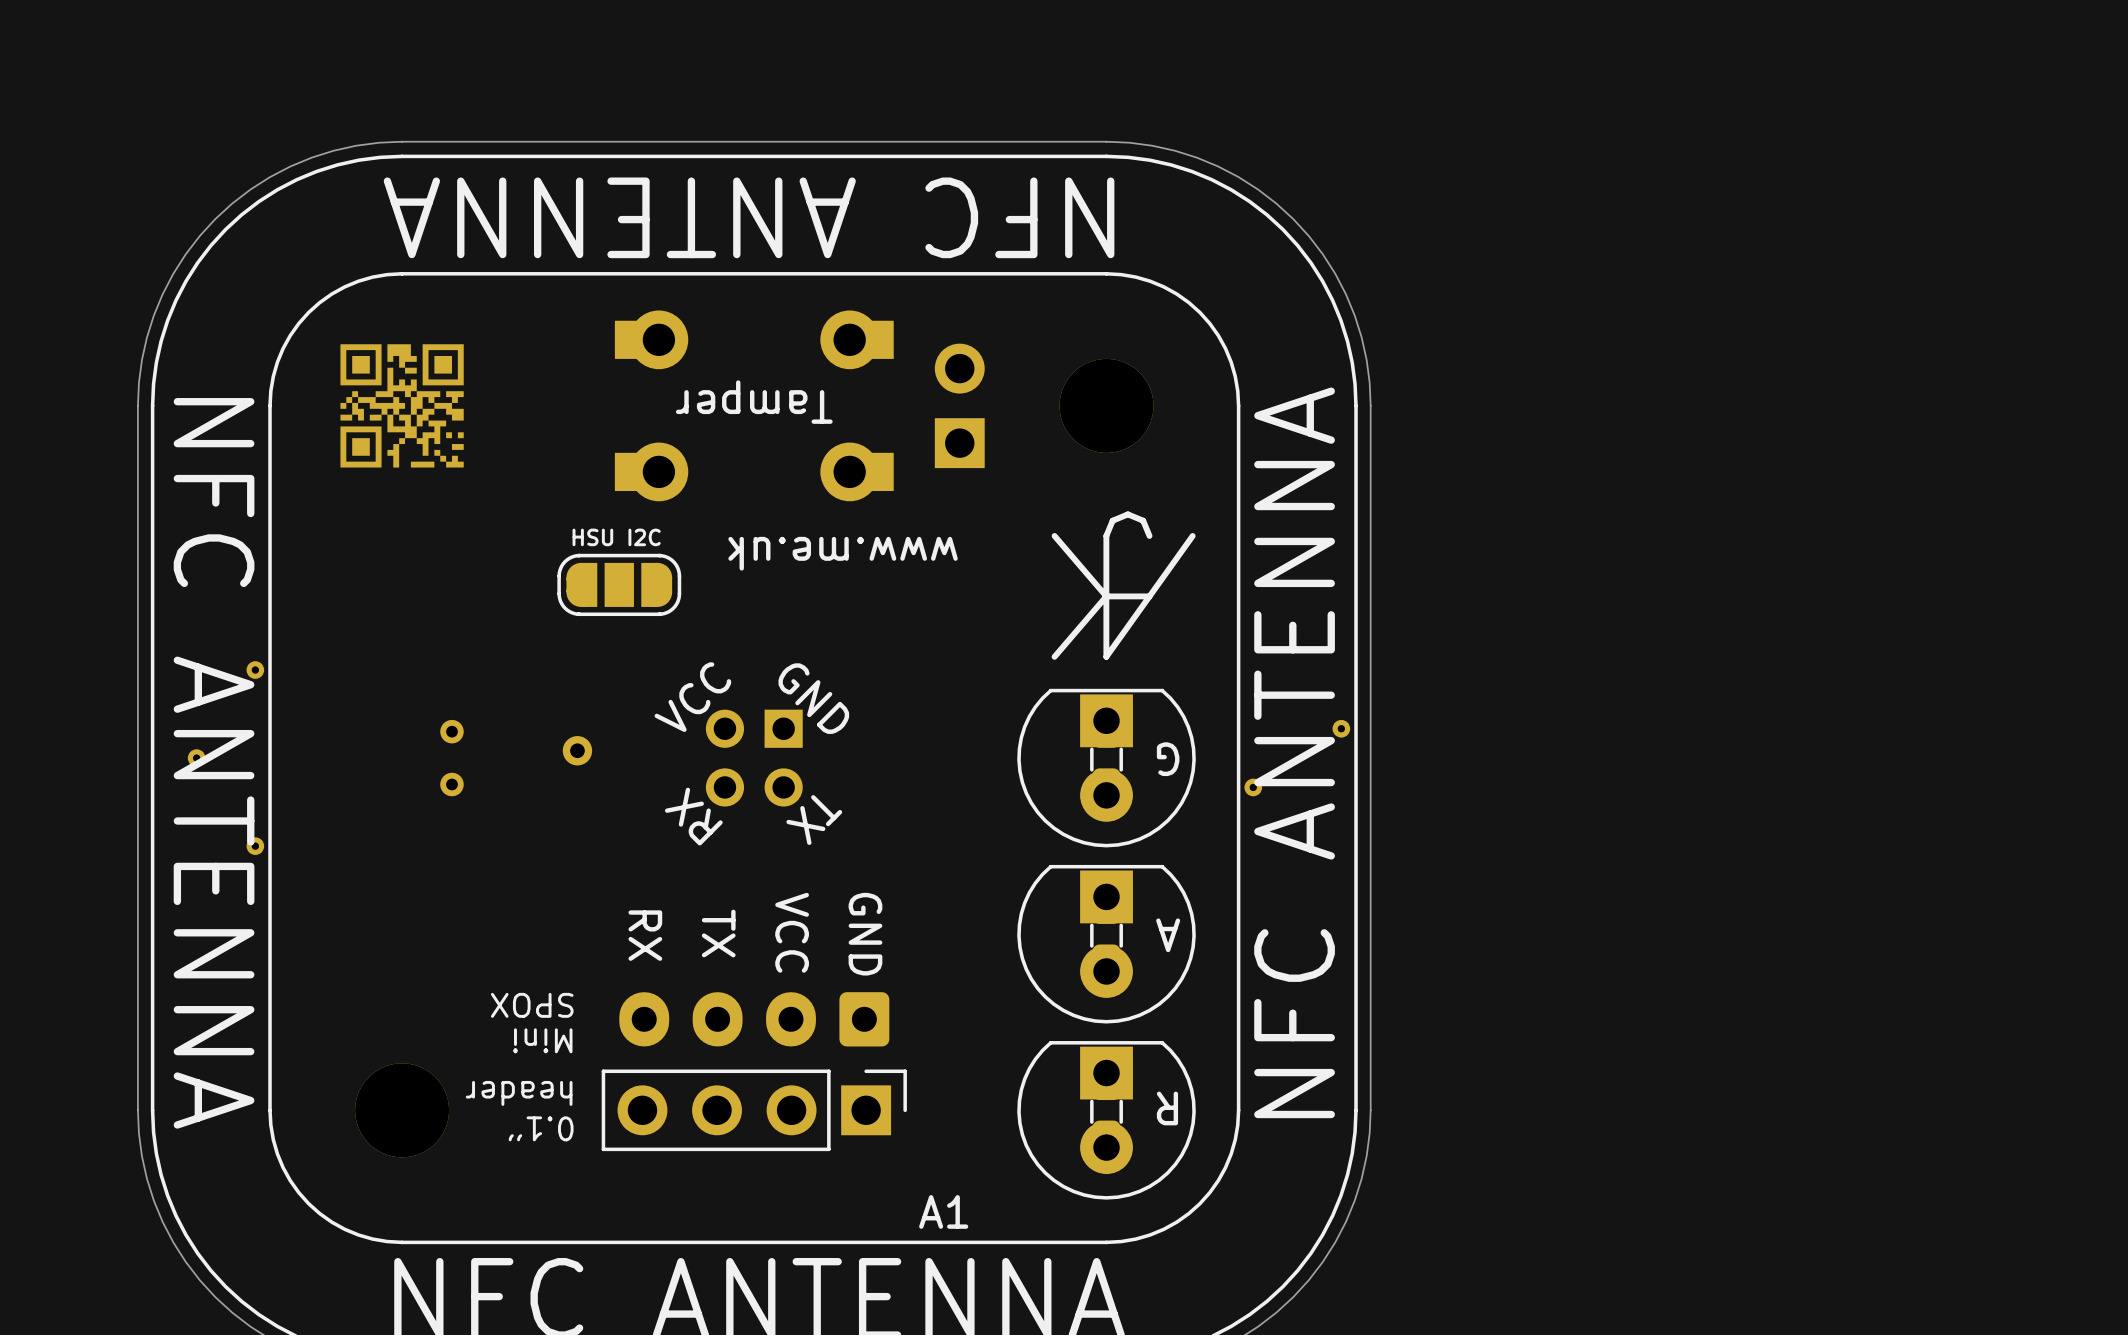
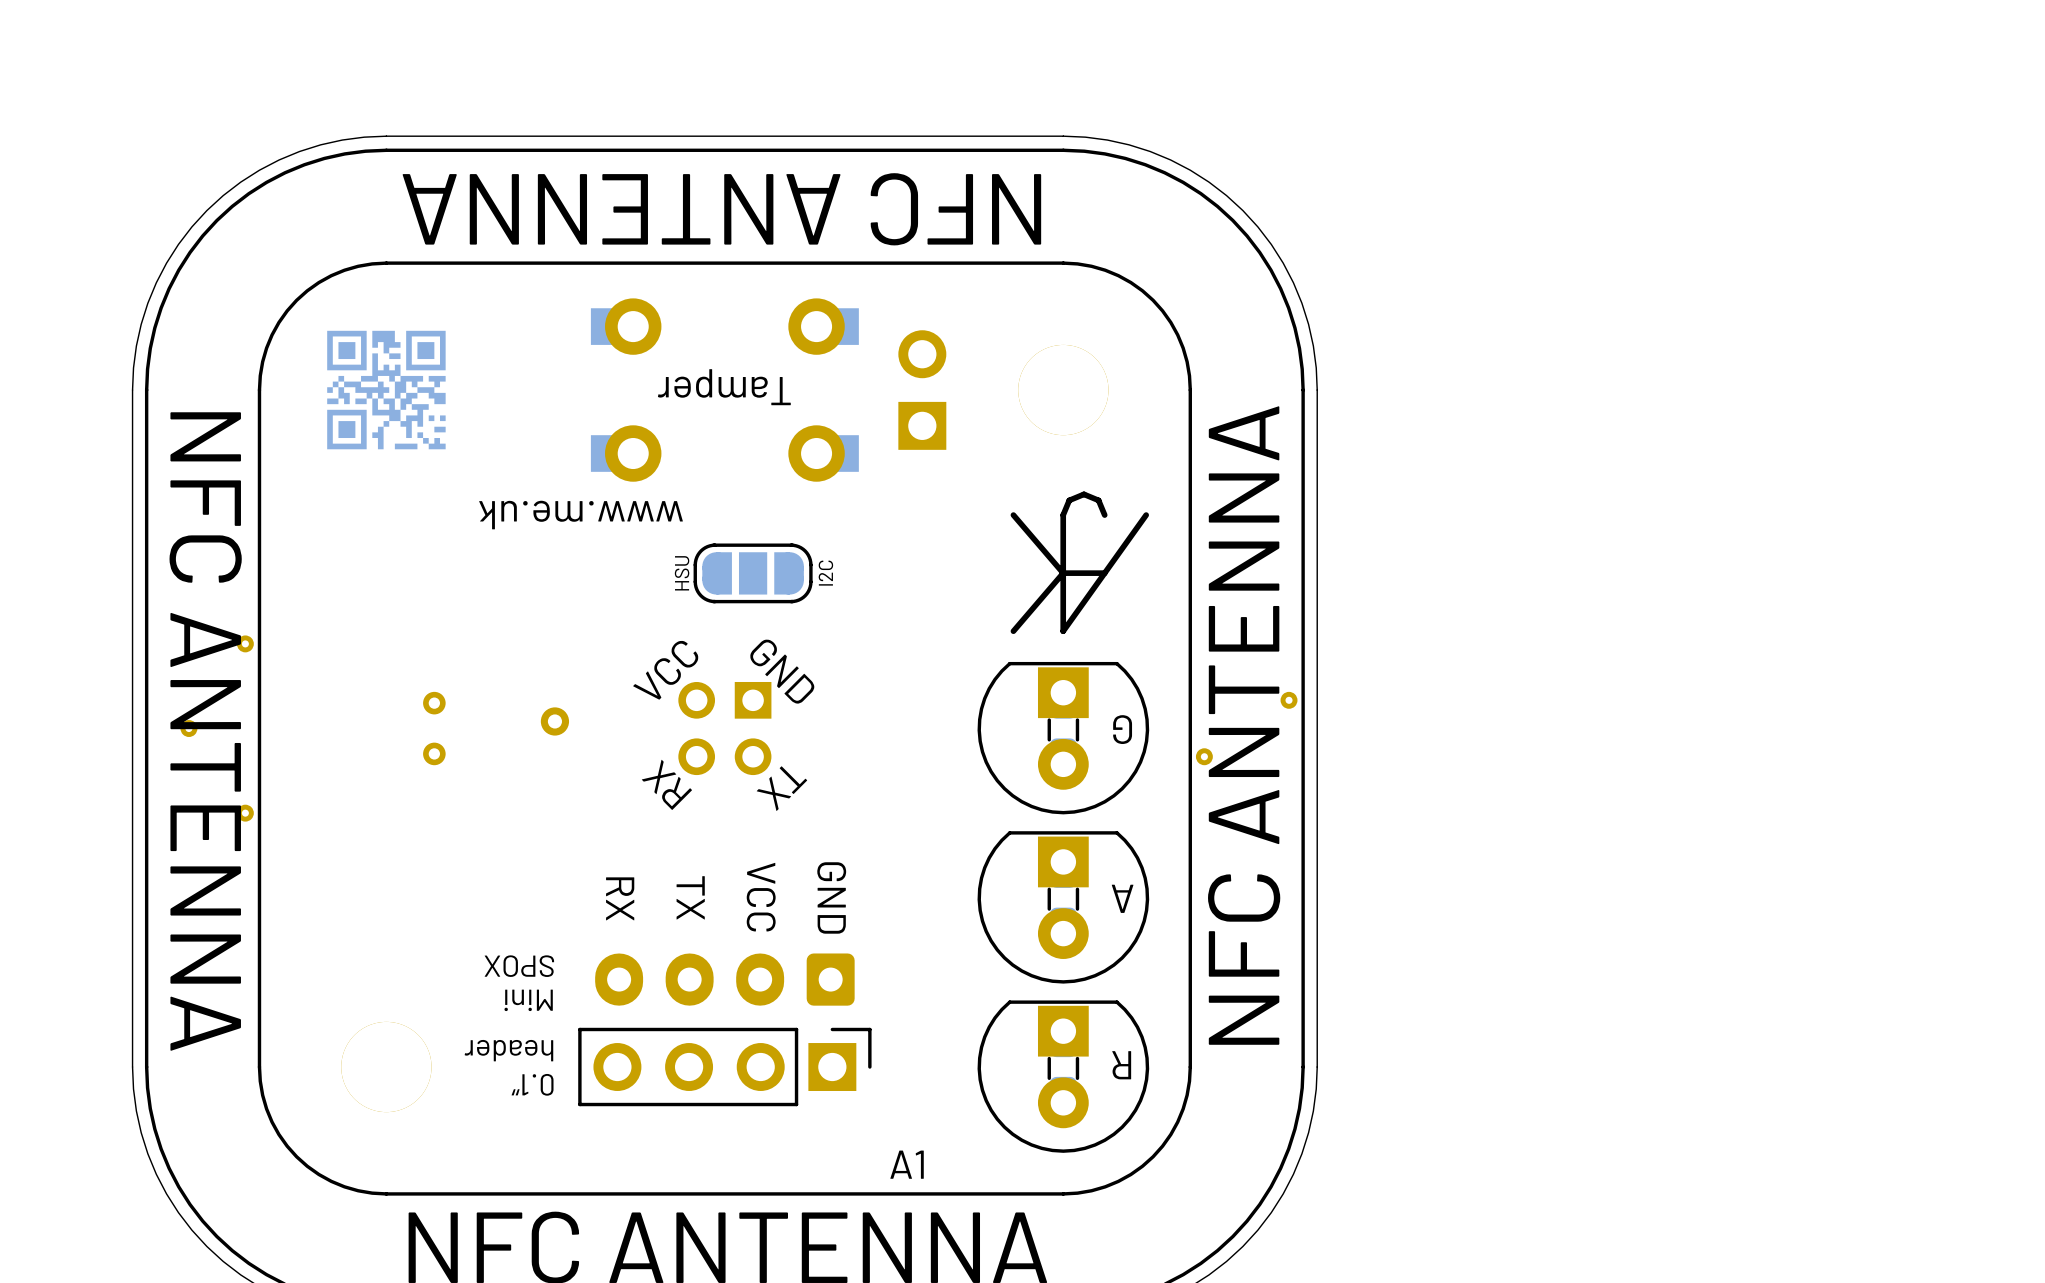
text: HSU (592, 537) -> www.me.uk (581, 515)
text rotation: 0° (644, 537) -> 90° counterclockwise (825, 573)
text position: I2C (644, 537) -> I2C (825, 573)
text: www.me.uk (843, 553) -> none
part position: (619, 584) -> (753, 573)
text: none -> HSU (682, 573)

